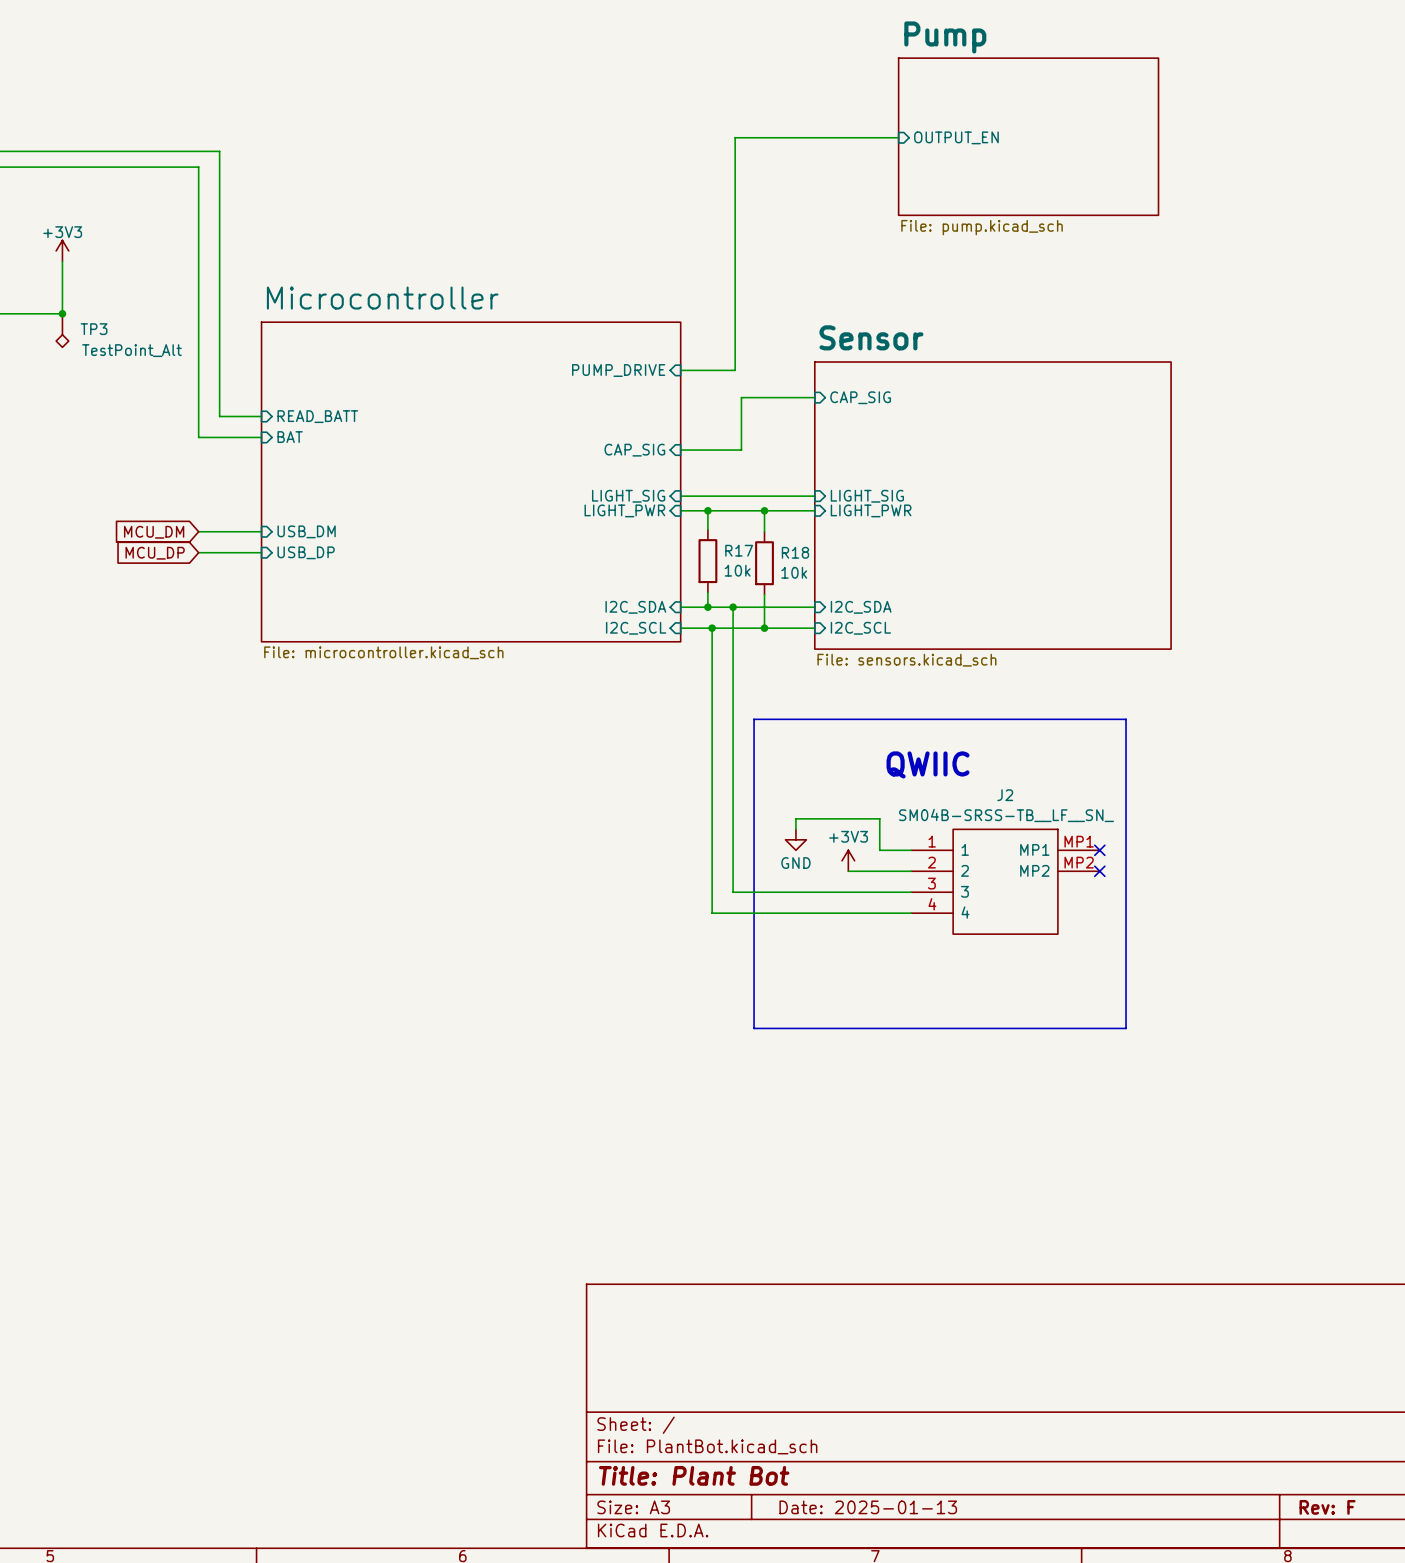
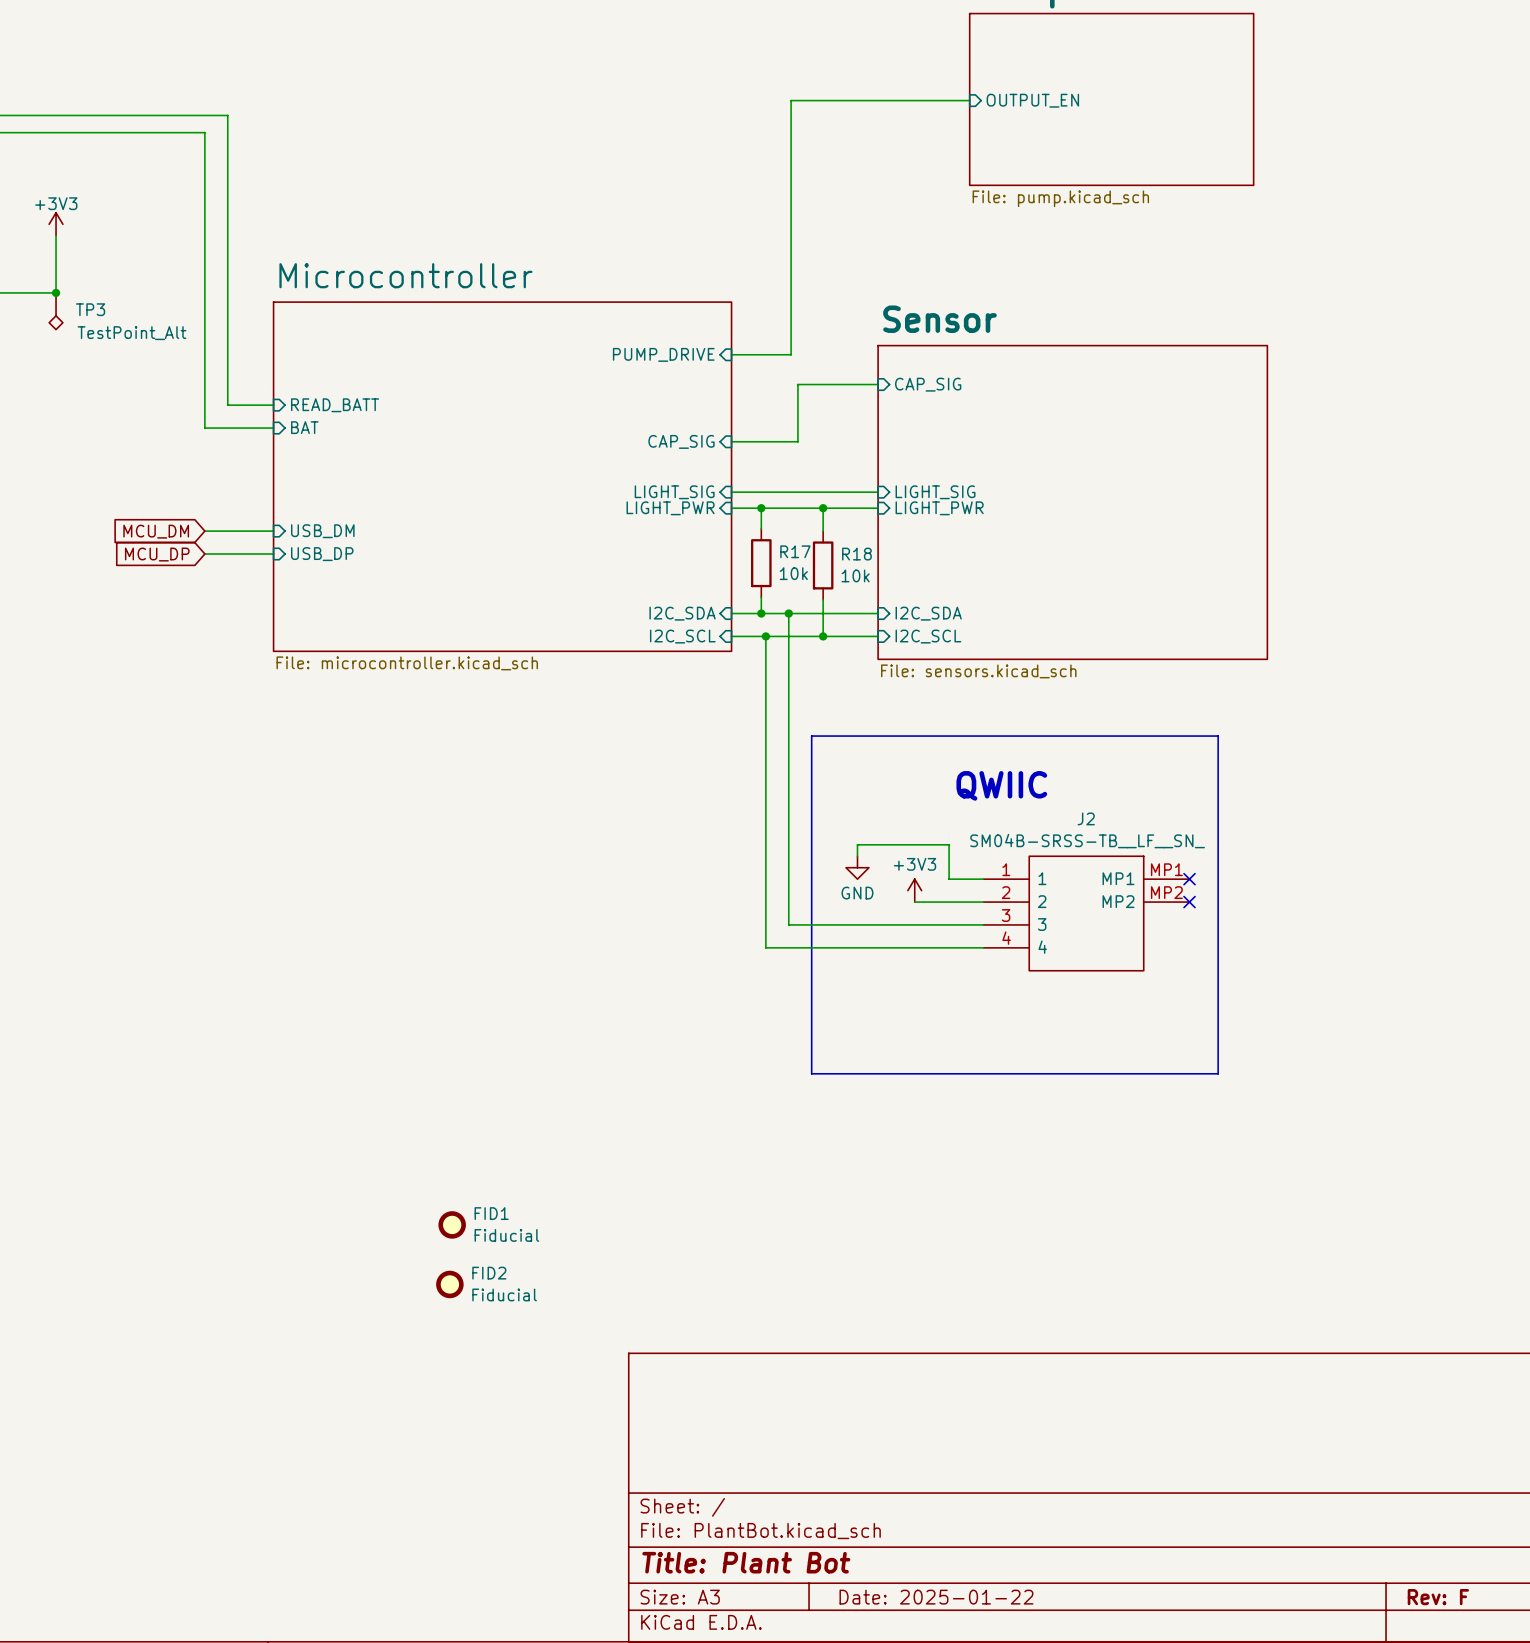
FID1: none -> Fiducial (452, 1224)
FID2: none -> Fiducial (449, 1284)
title block: Date: 2025-01-13 (868, 1507) -> Date: 2025-01-22 (936, 1597)

